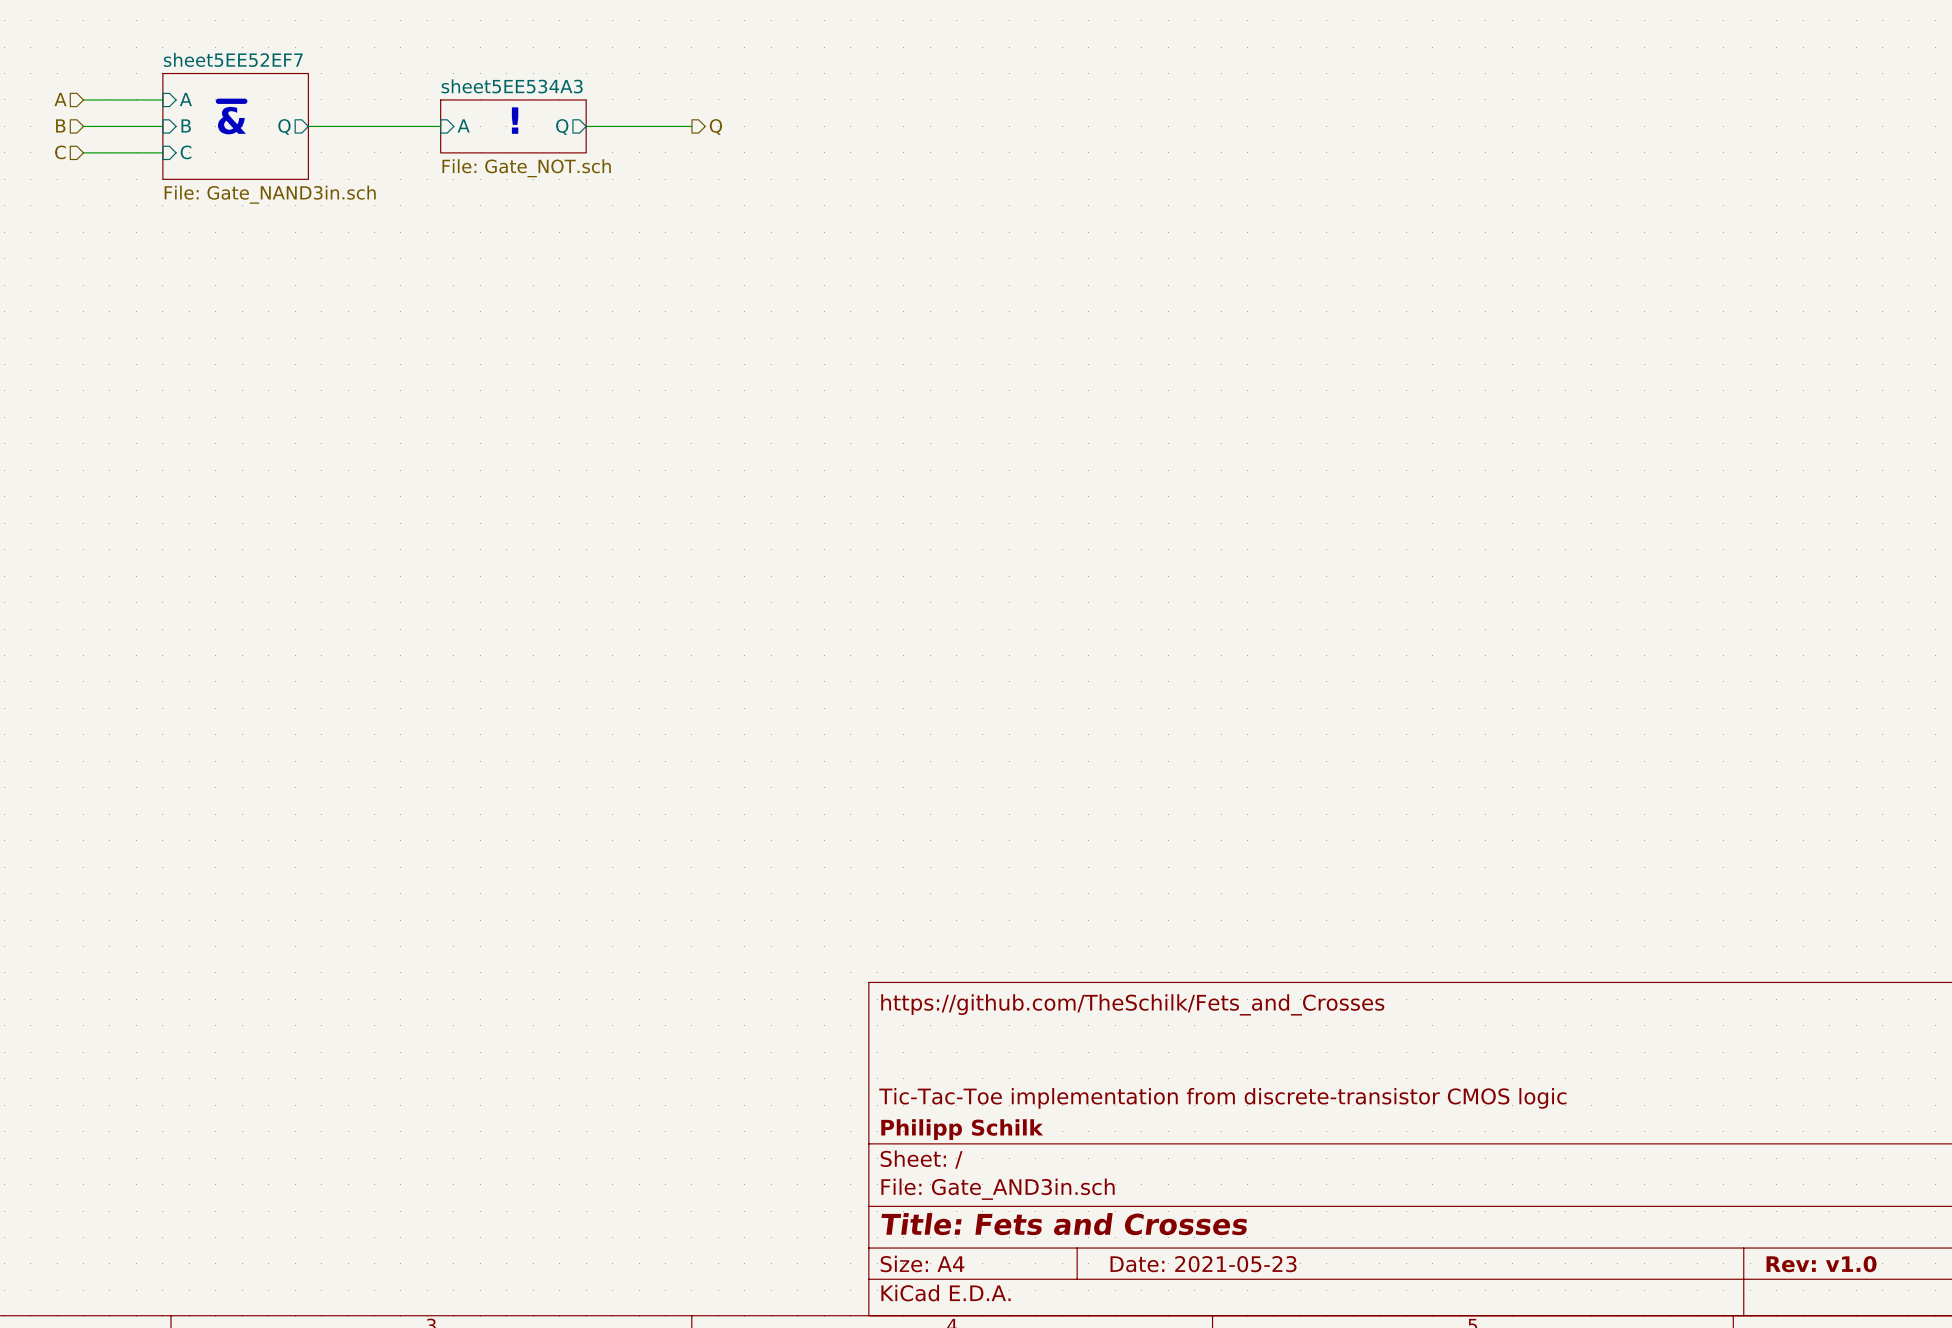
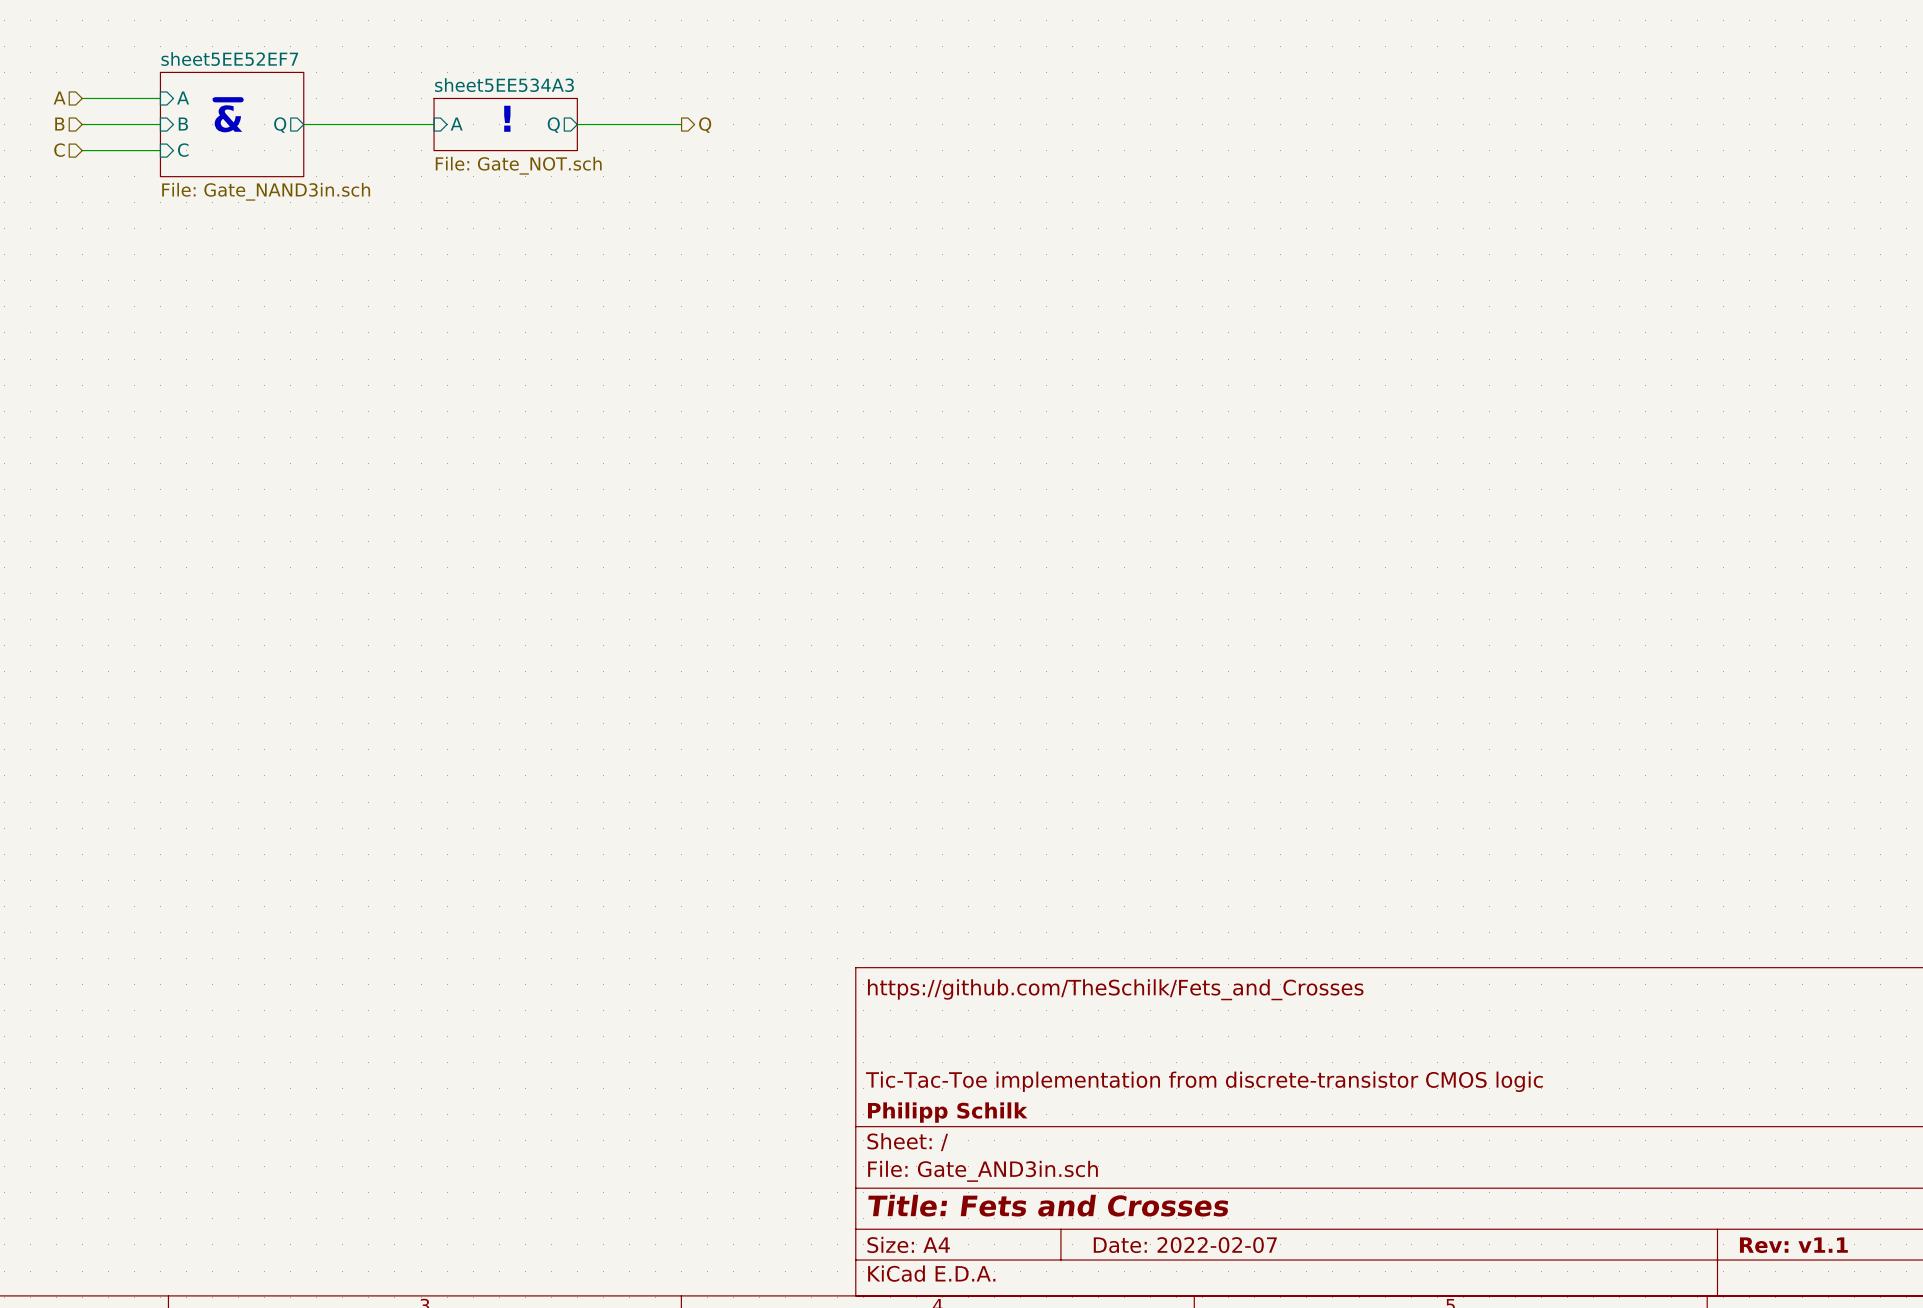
title block: Date: 2021-05-23 (1203, 1264) -> Date: 2022-02-07 (1185, 1245)
title block: Rev: v1.0 (1821, 1264) -> Rev: v1.1 (1793, 1245)

